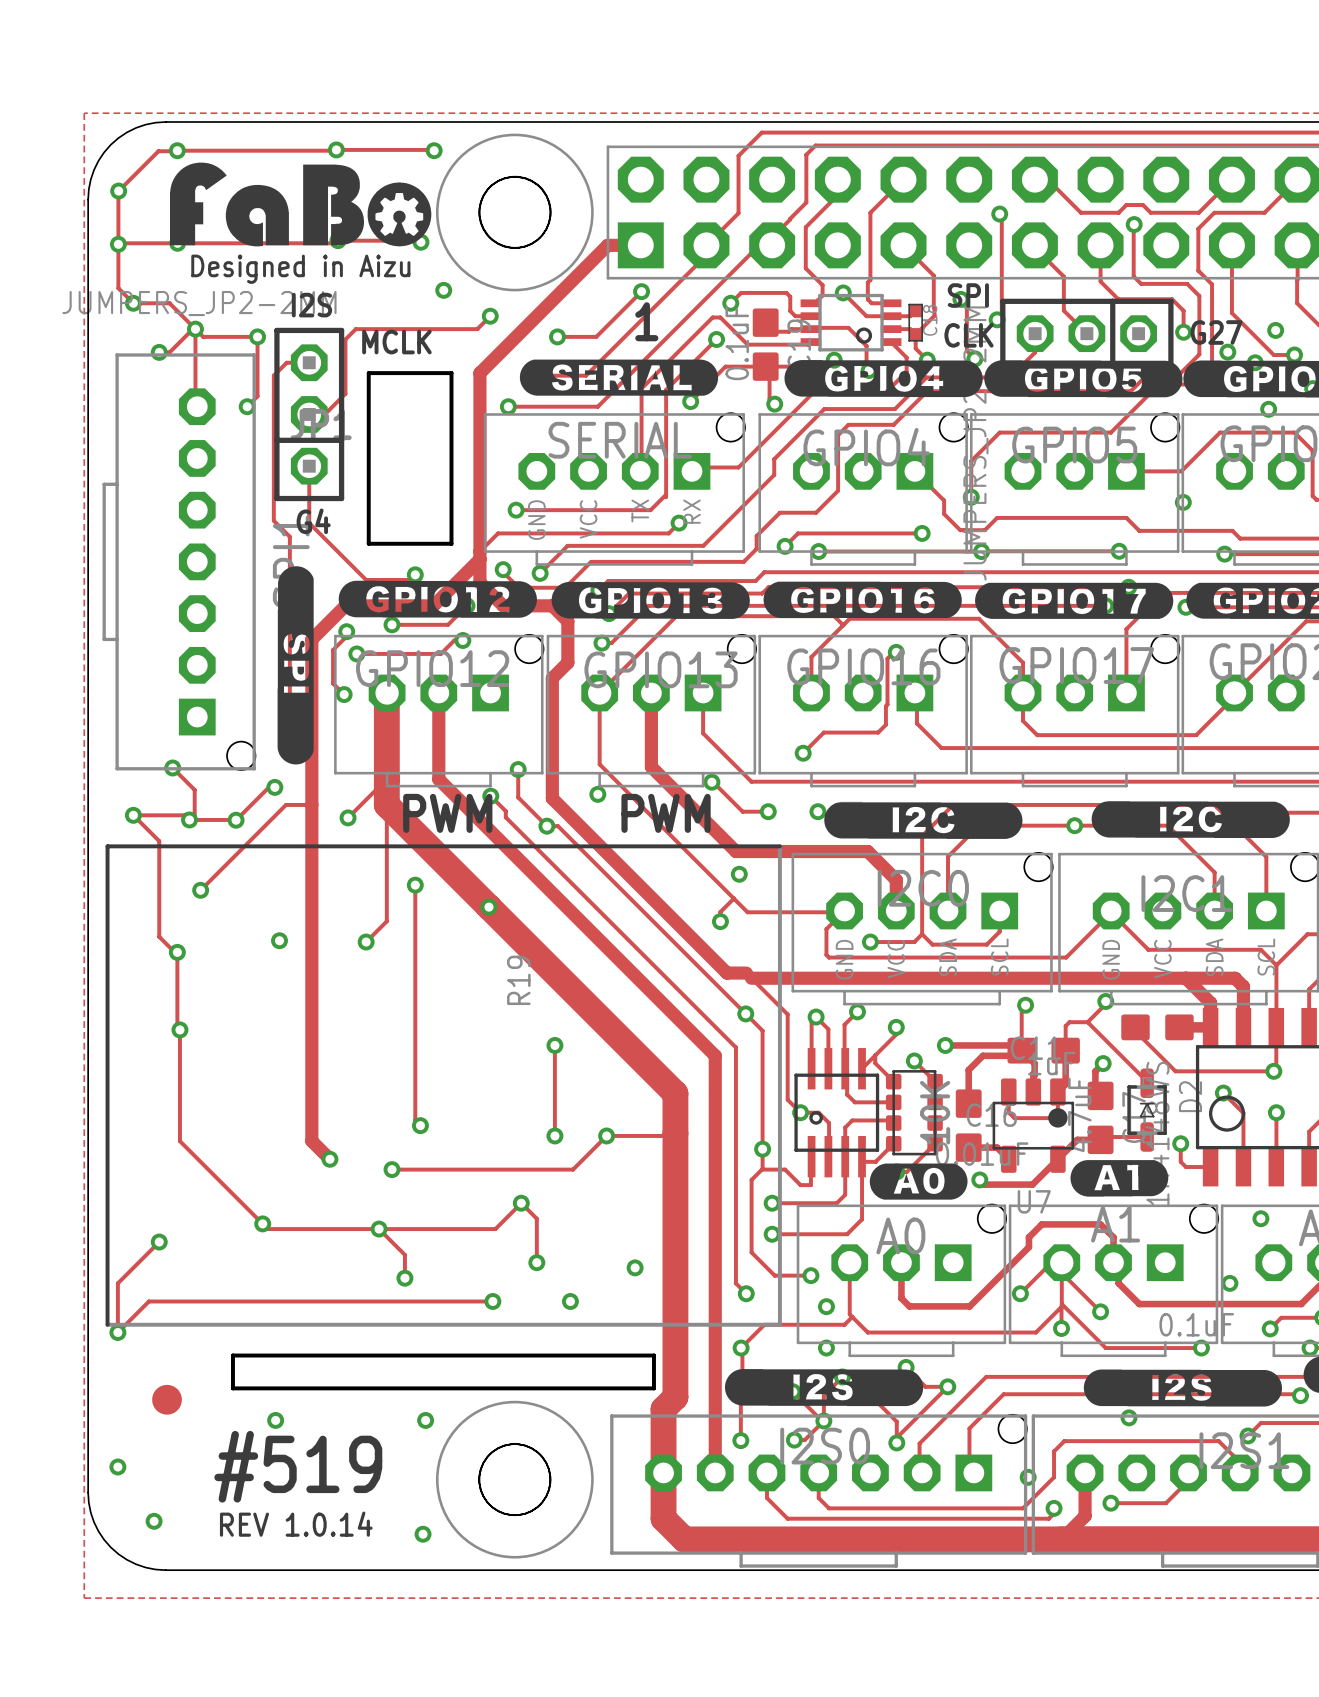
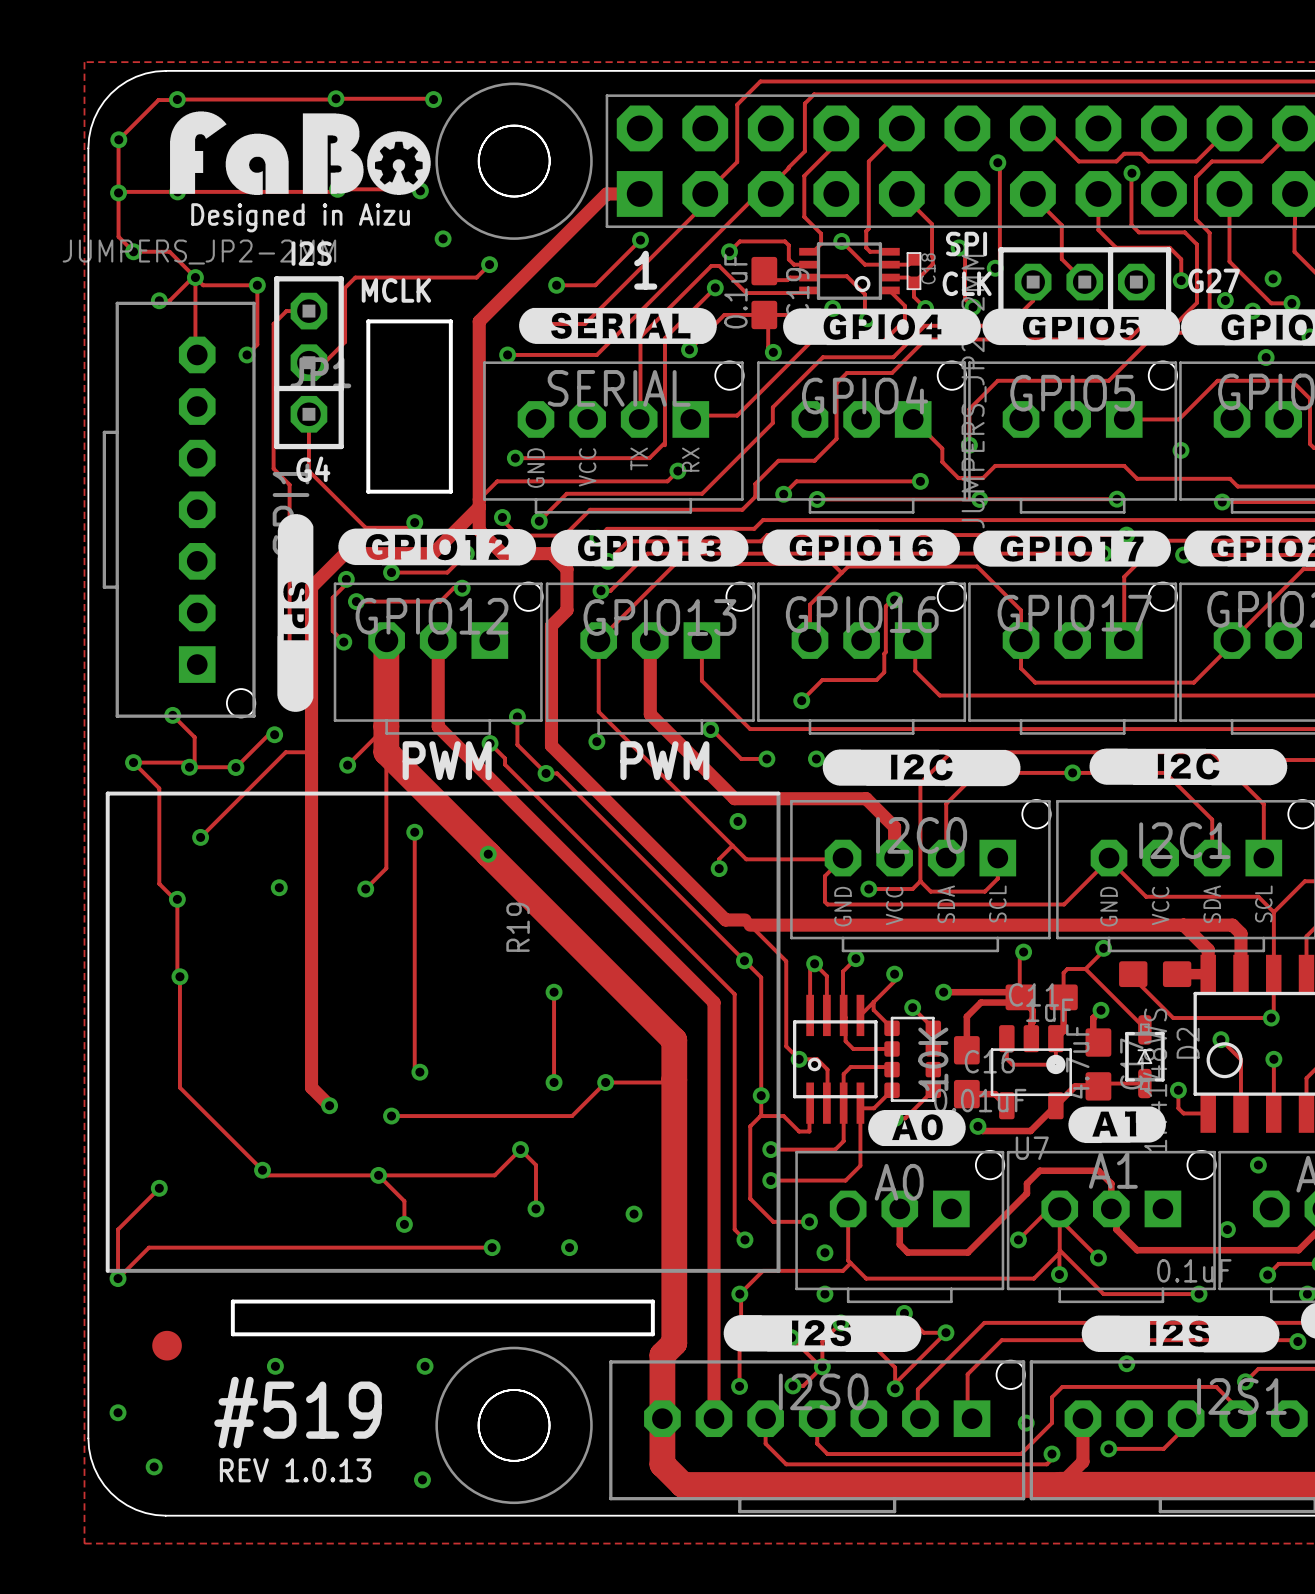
text: REV 1.0.14 (296, 1524) -> REV 1.0.13 (295, 1470)

